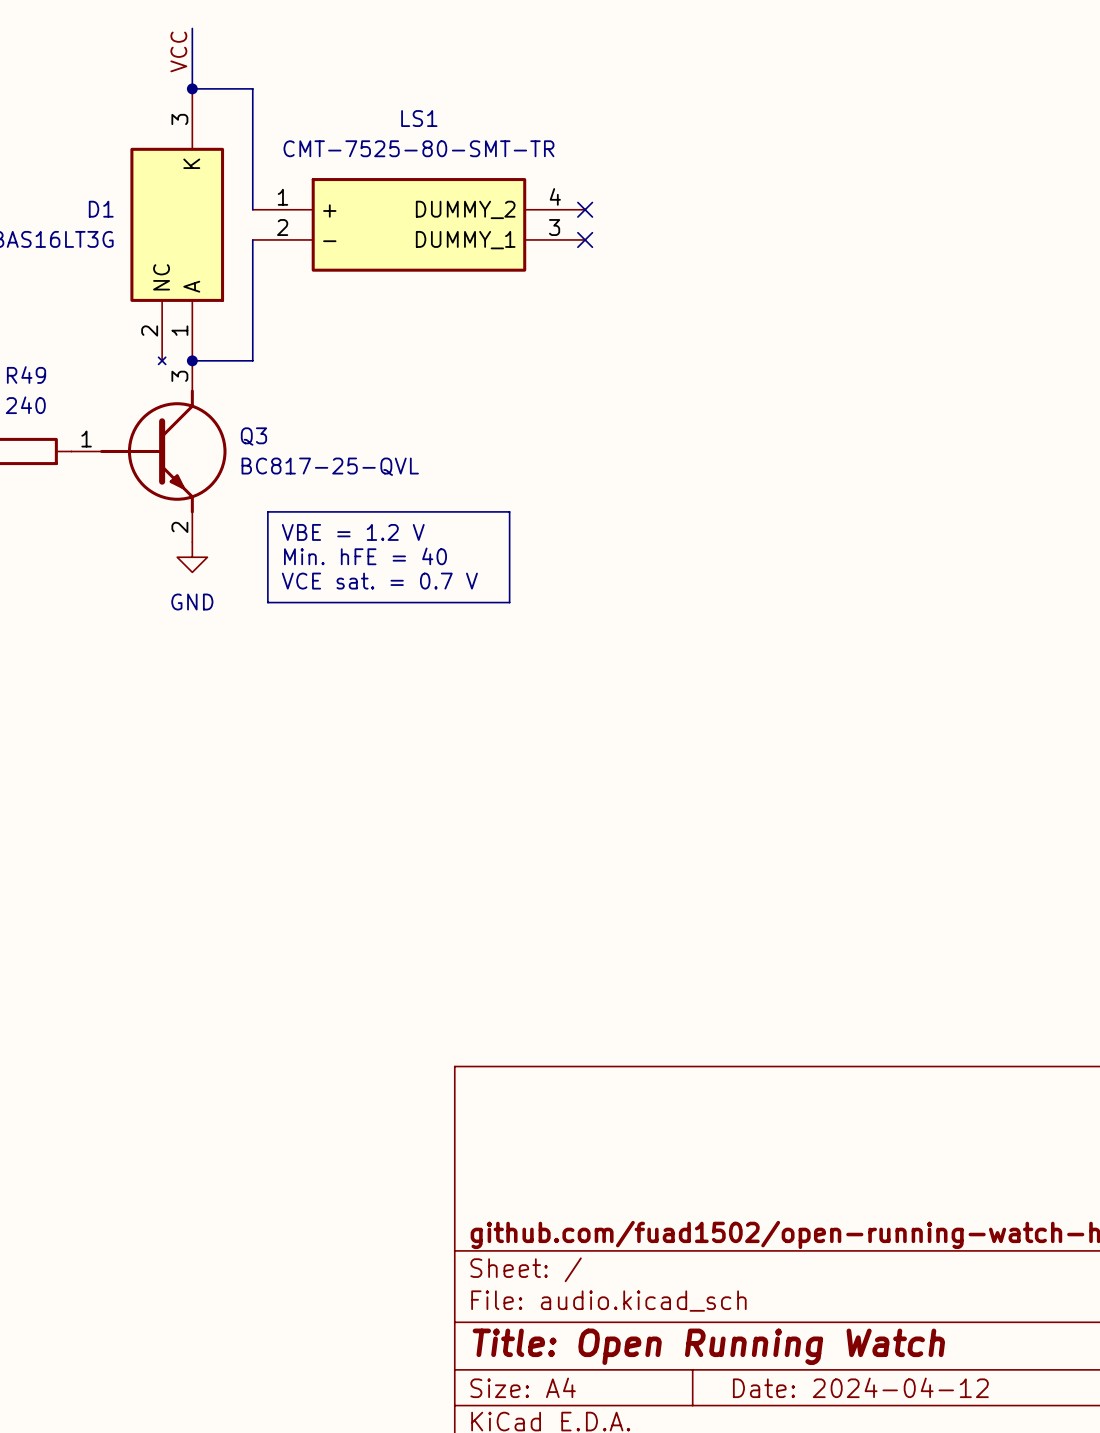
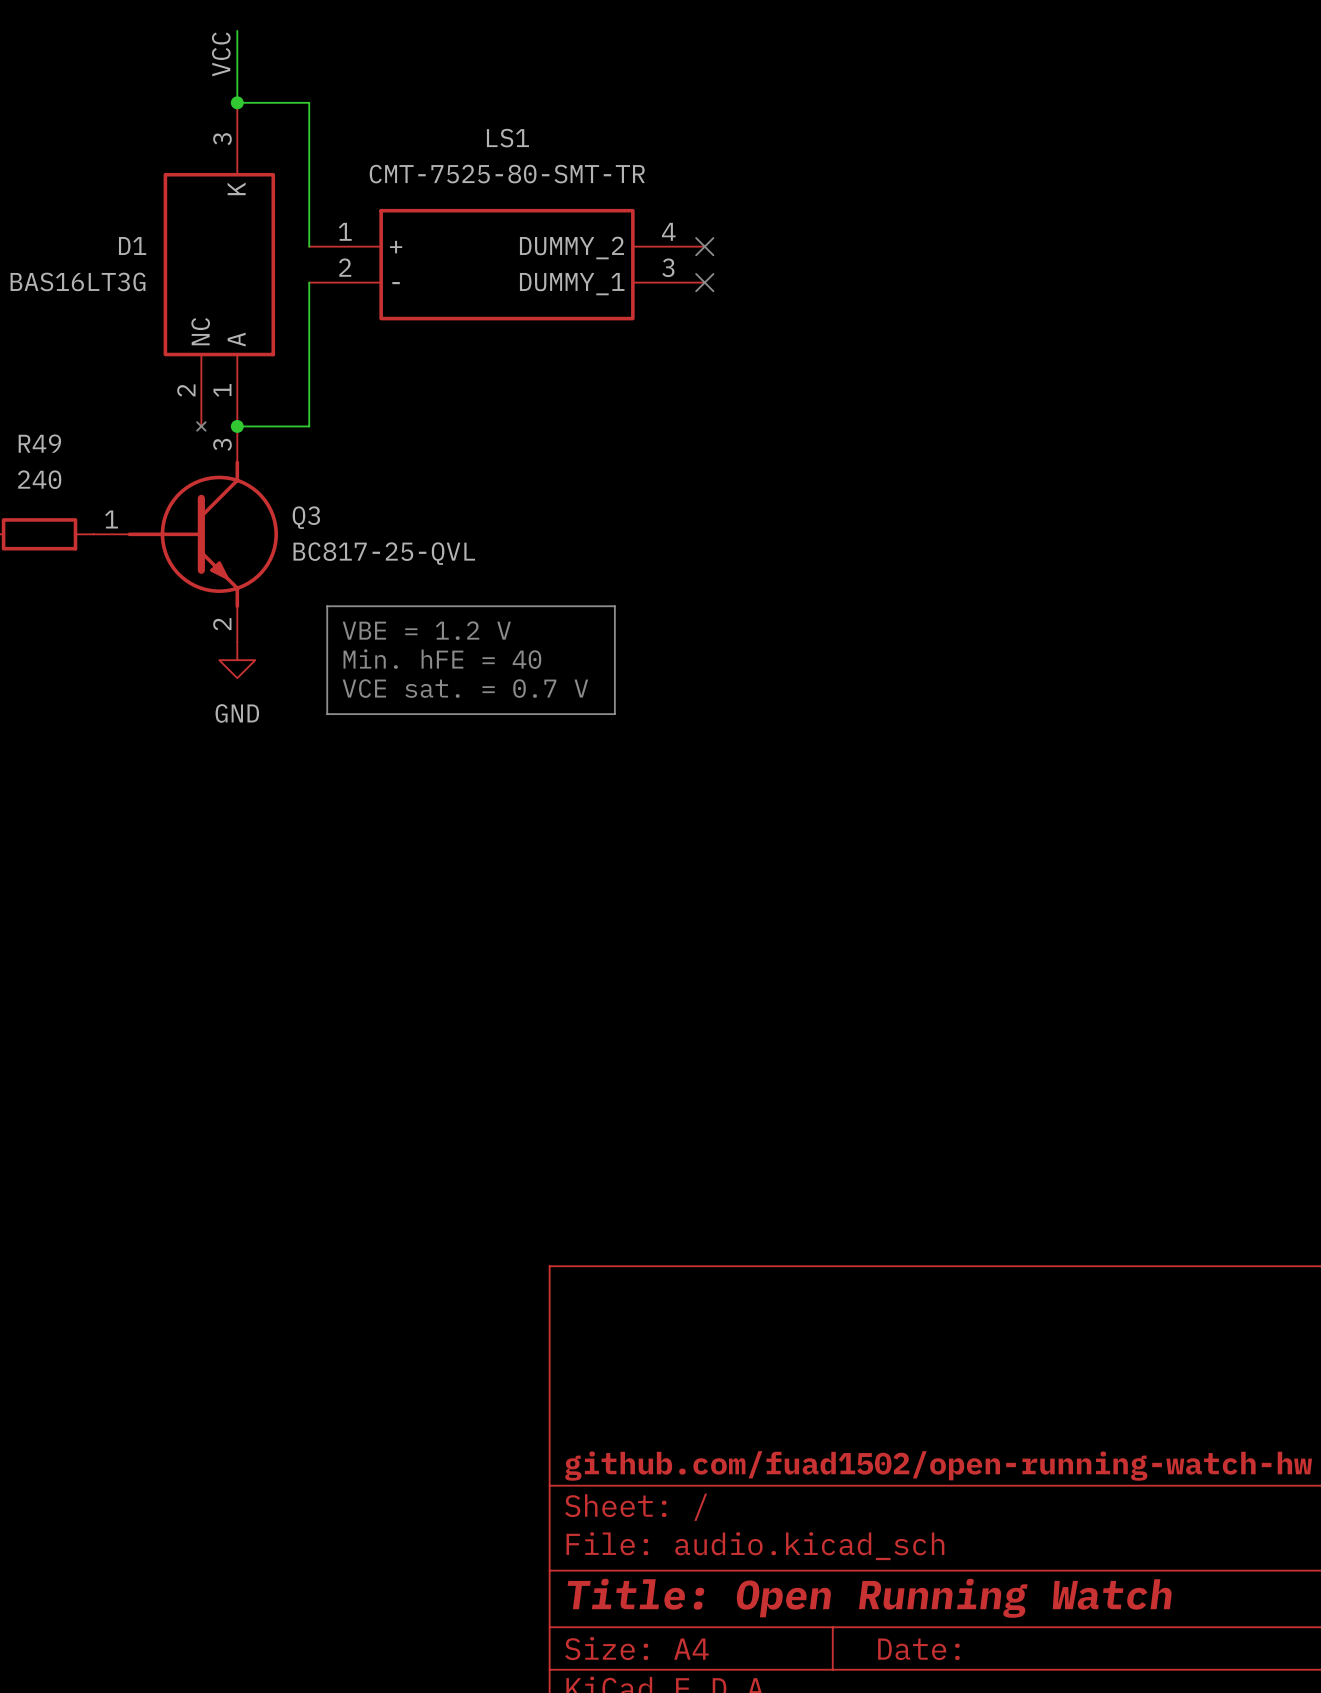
title block: Date: 2024-04-12 (860, 1387) -> Date: (918, 1649)

